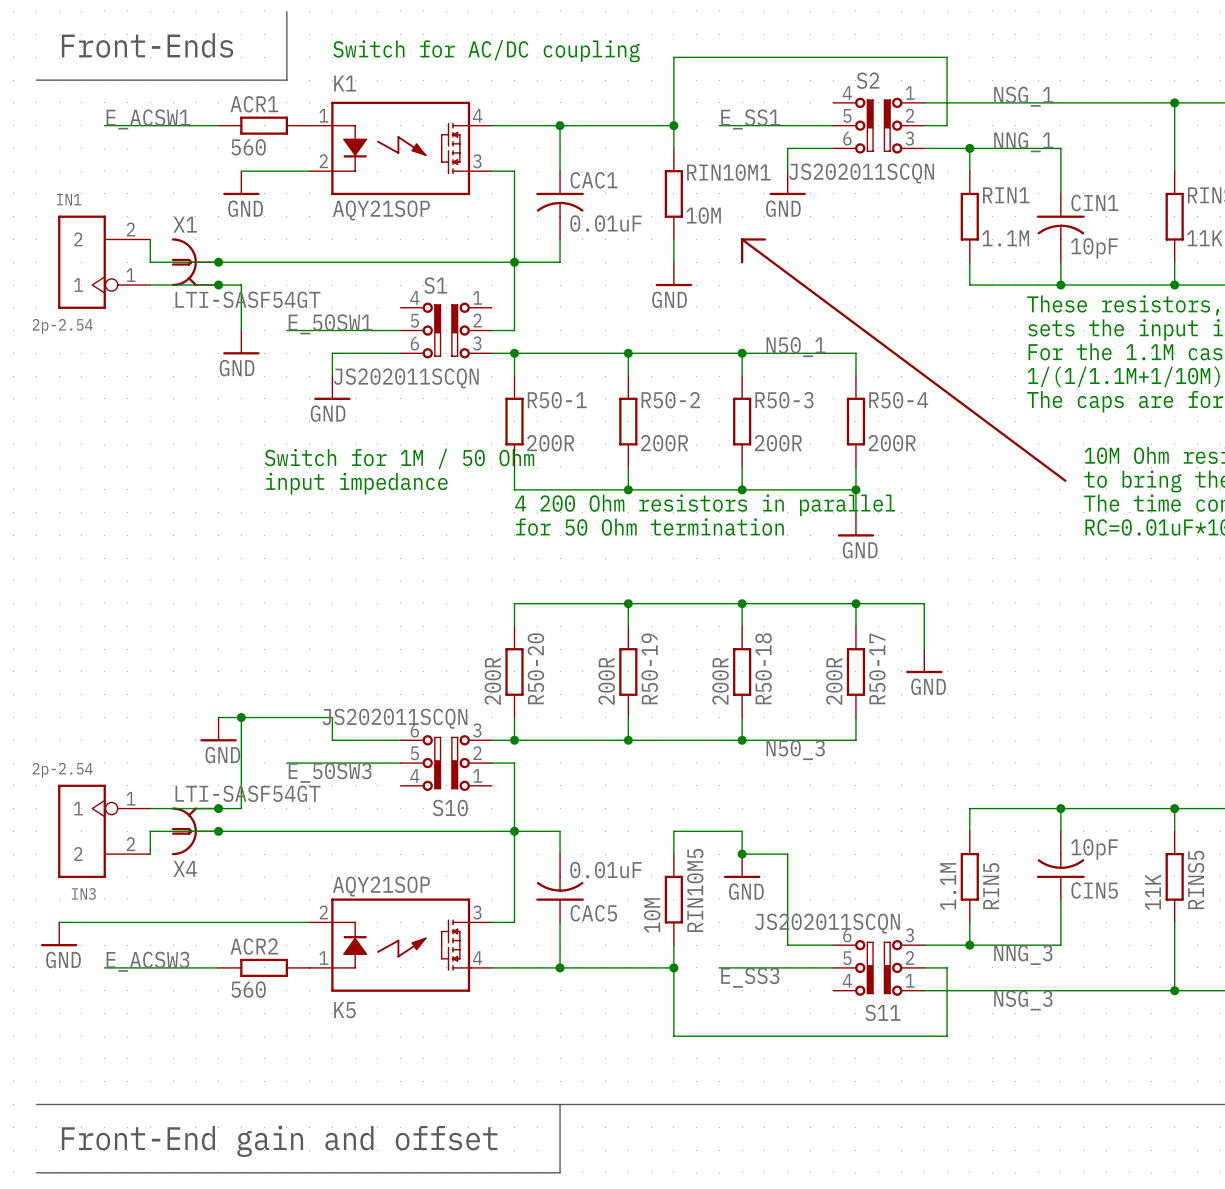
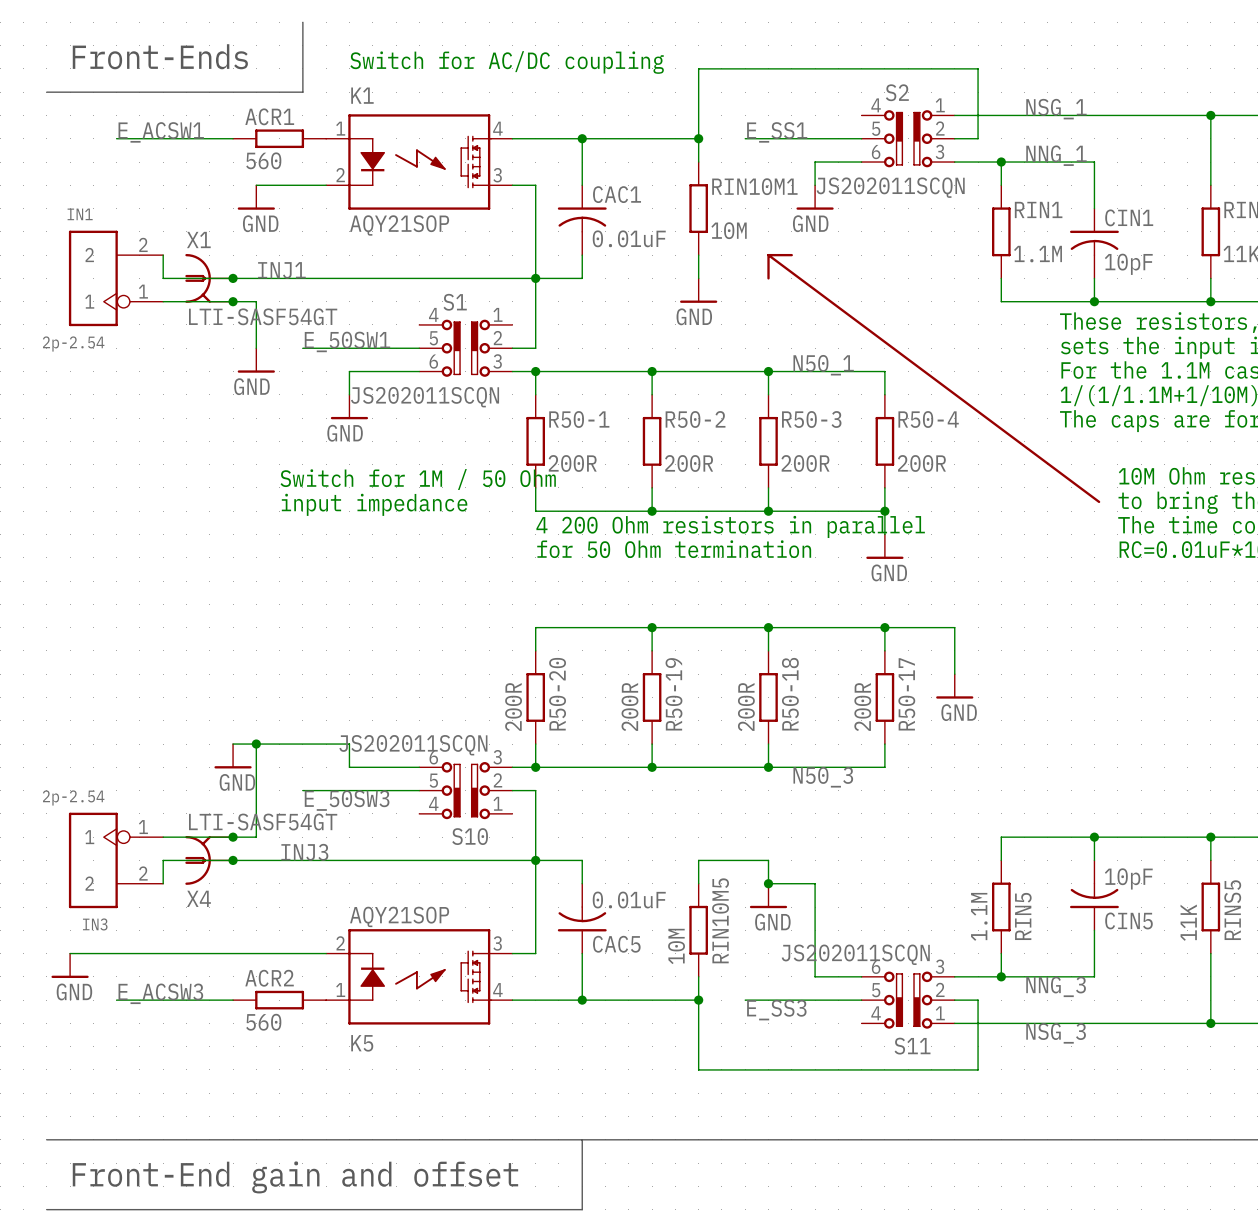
label: none -> INJ1 (281, 270)
label: none -> INJ3 (304, 852)

